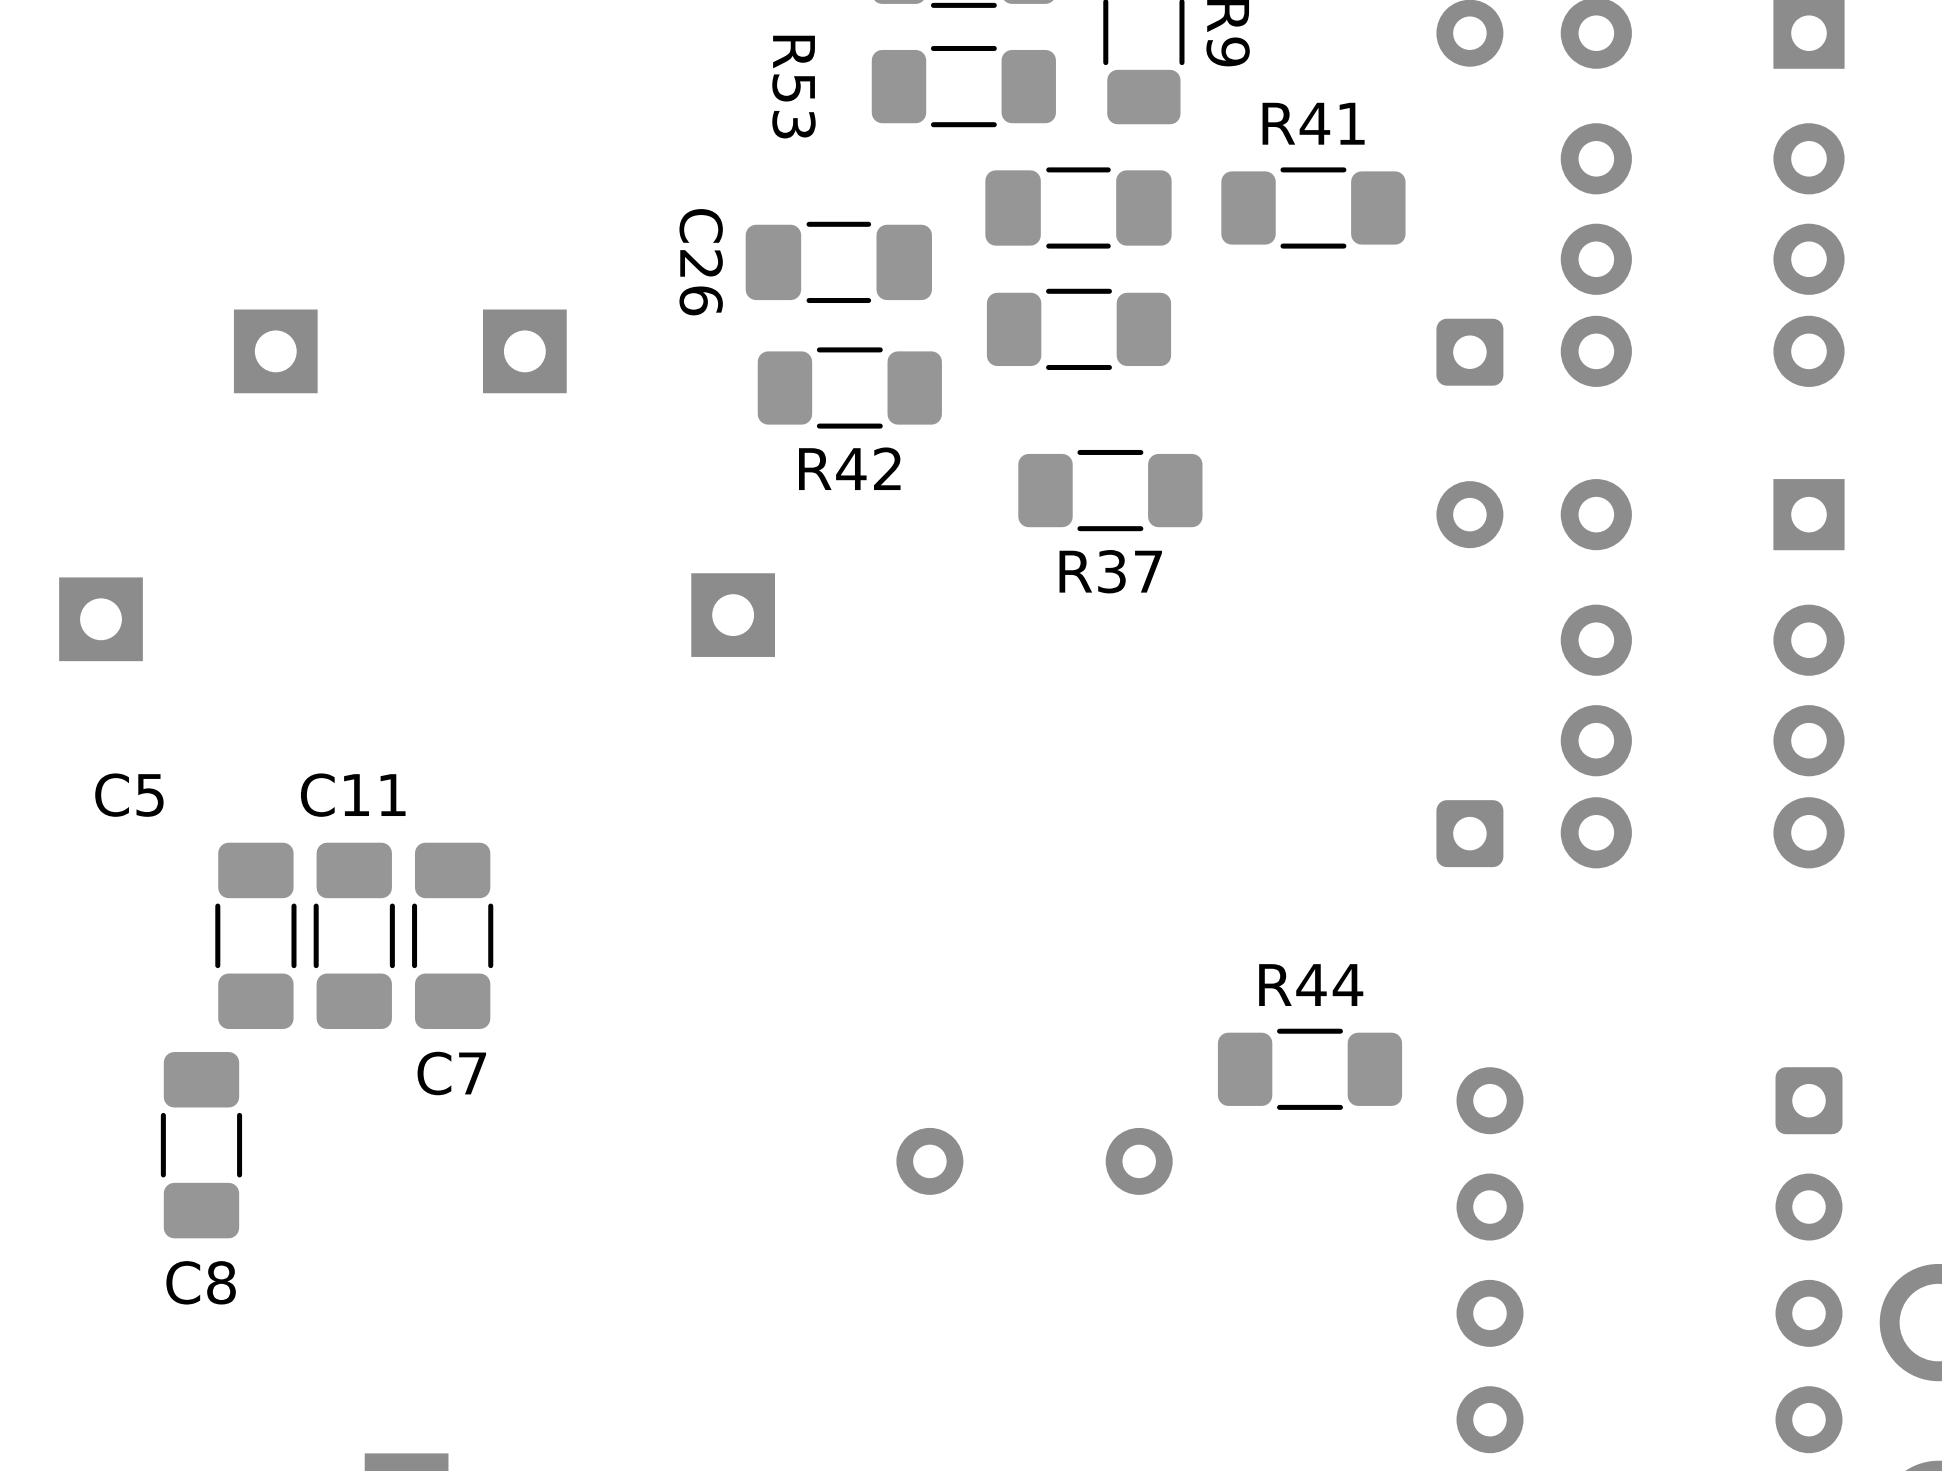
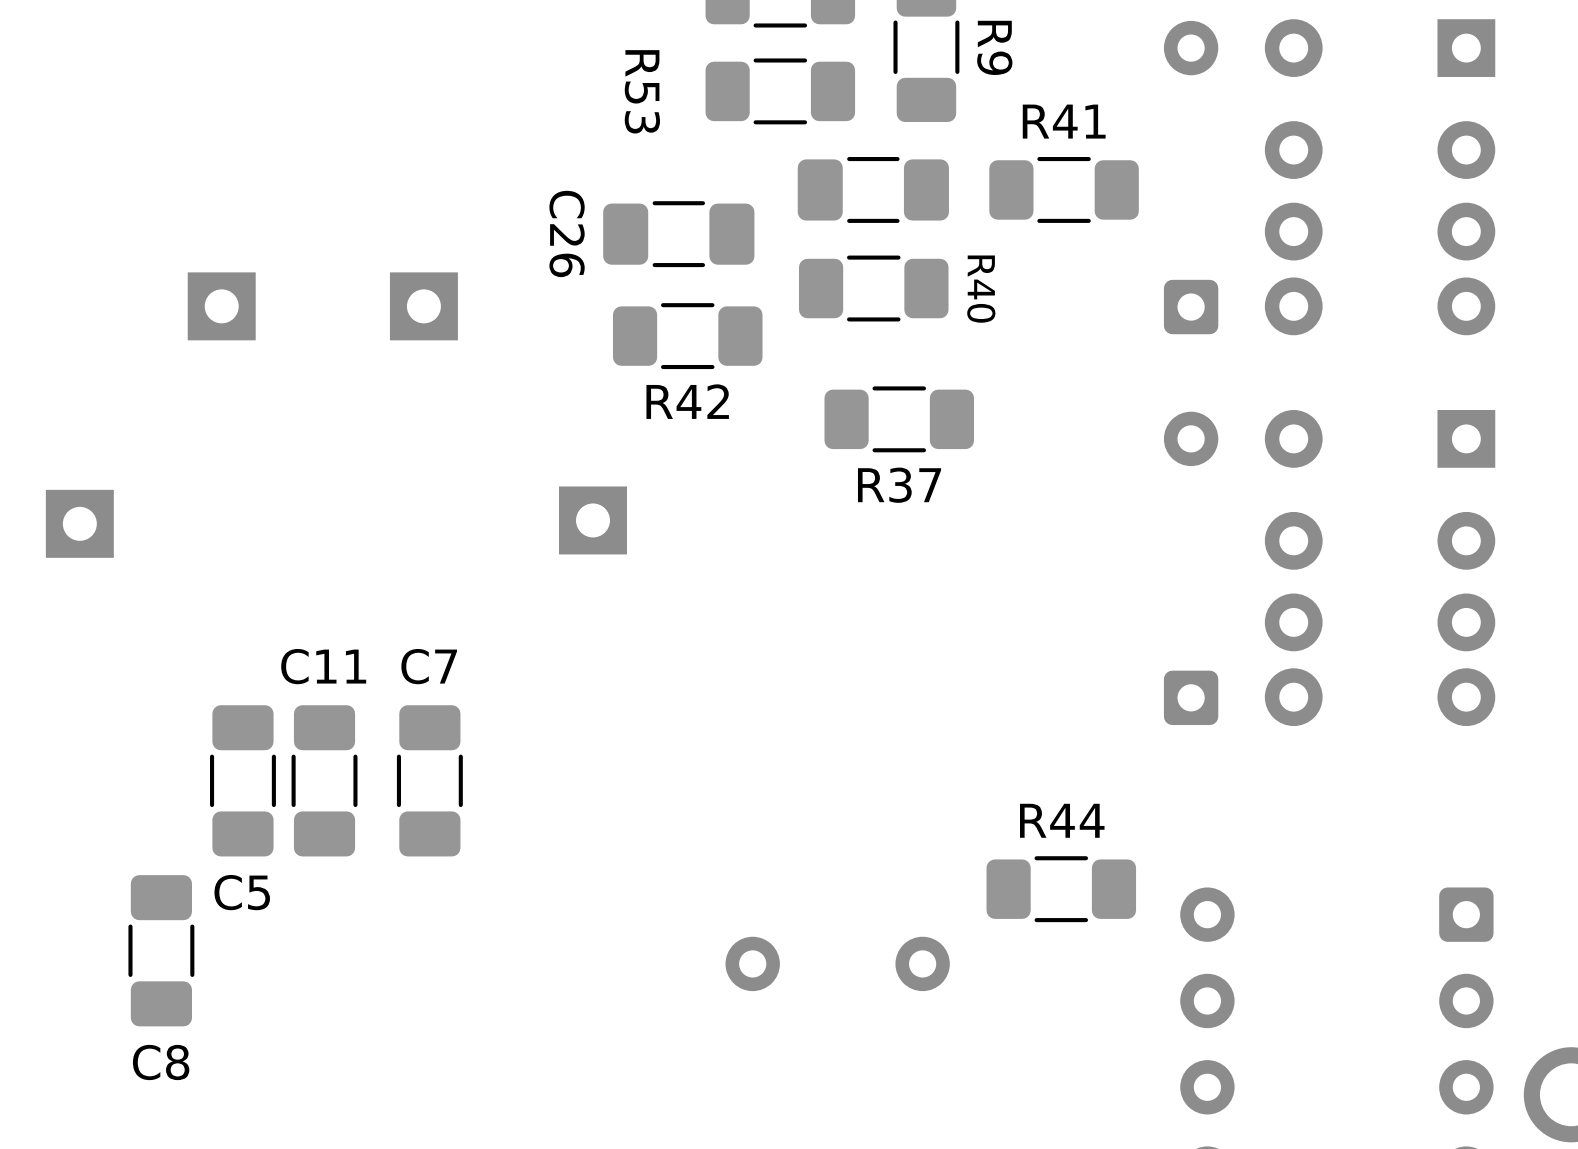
R40 name: none -> R40 (981, 289)
C5 name position: C5 (129, 795) -> C5 (242, 892)
C5 position: (255, 935) -> (242, 780)
C11 position: (354, 935) -> (324, 780)
C7 position: (452, 935) -> (429, 780)
C7 name position: C7 (451, 1073) -> C7 (429, 666)

